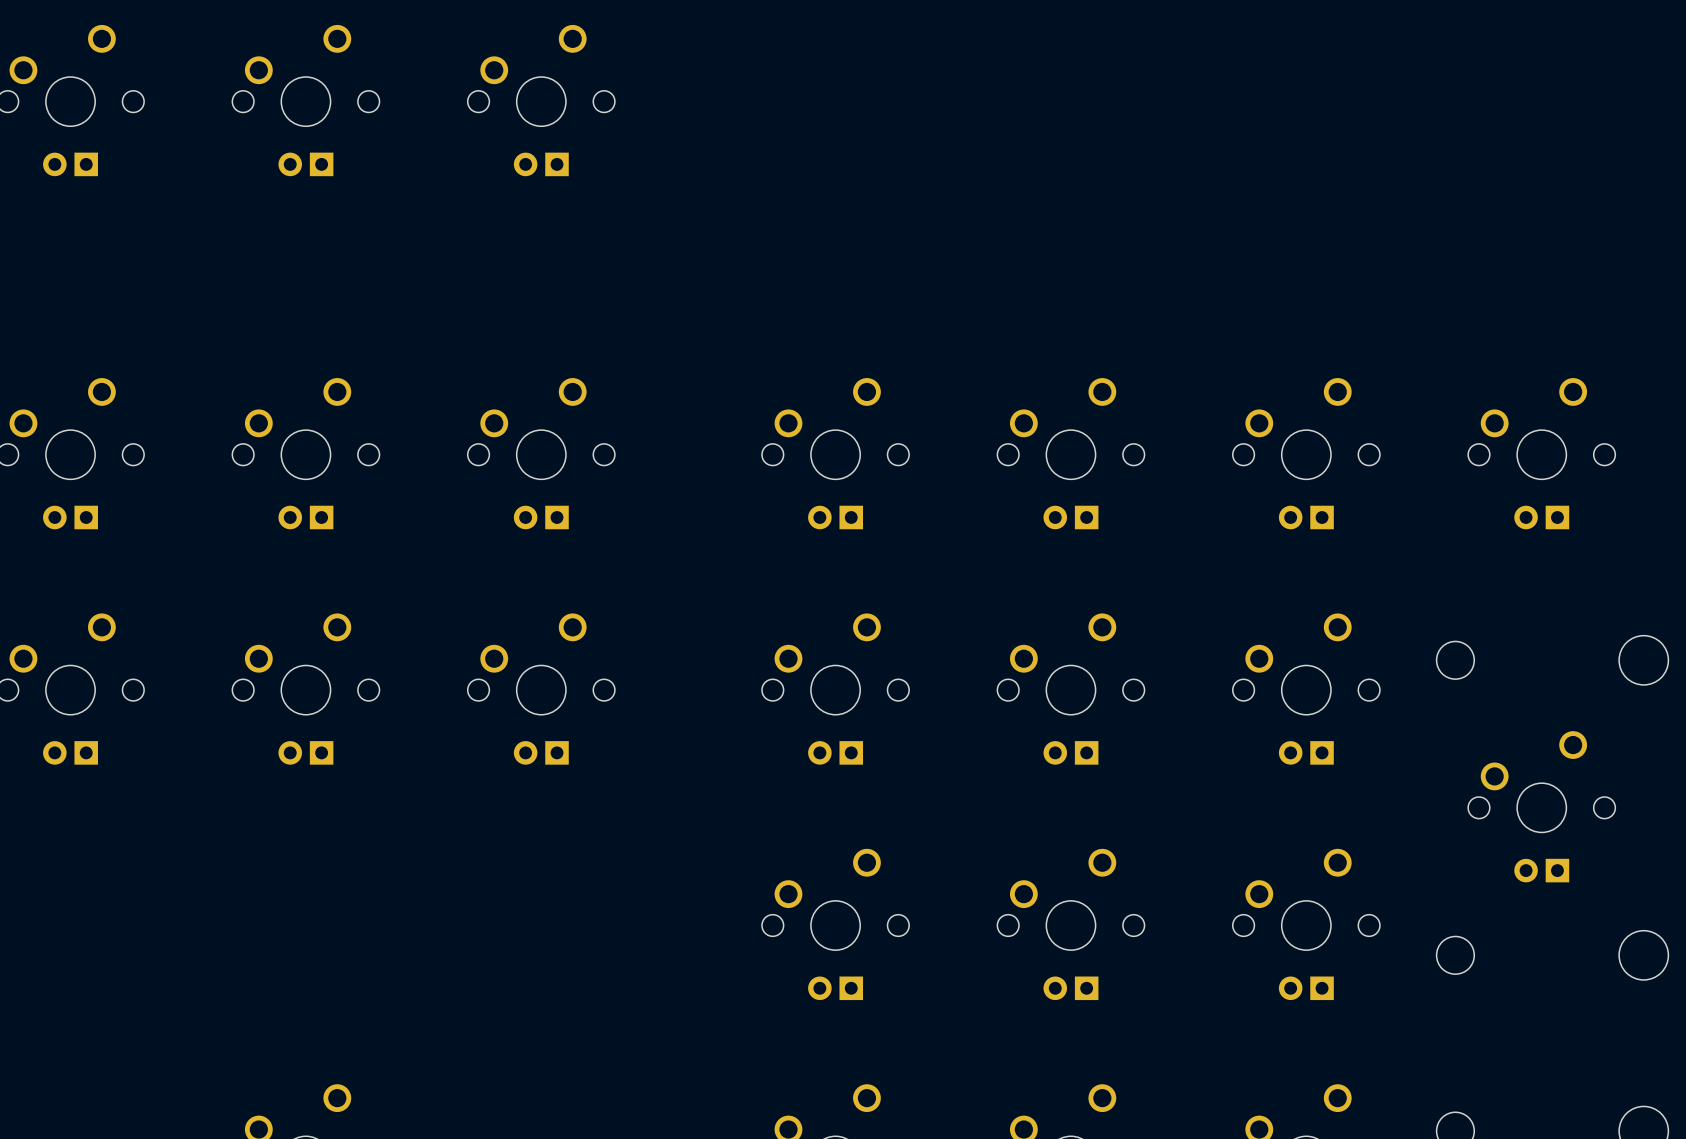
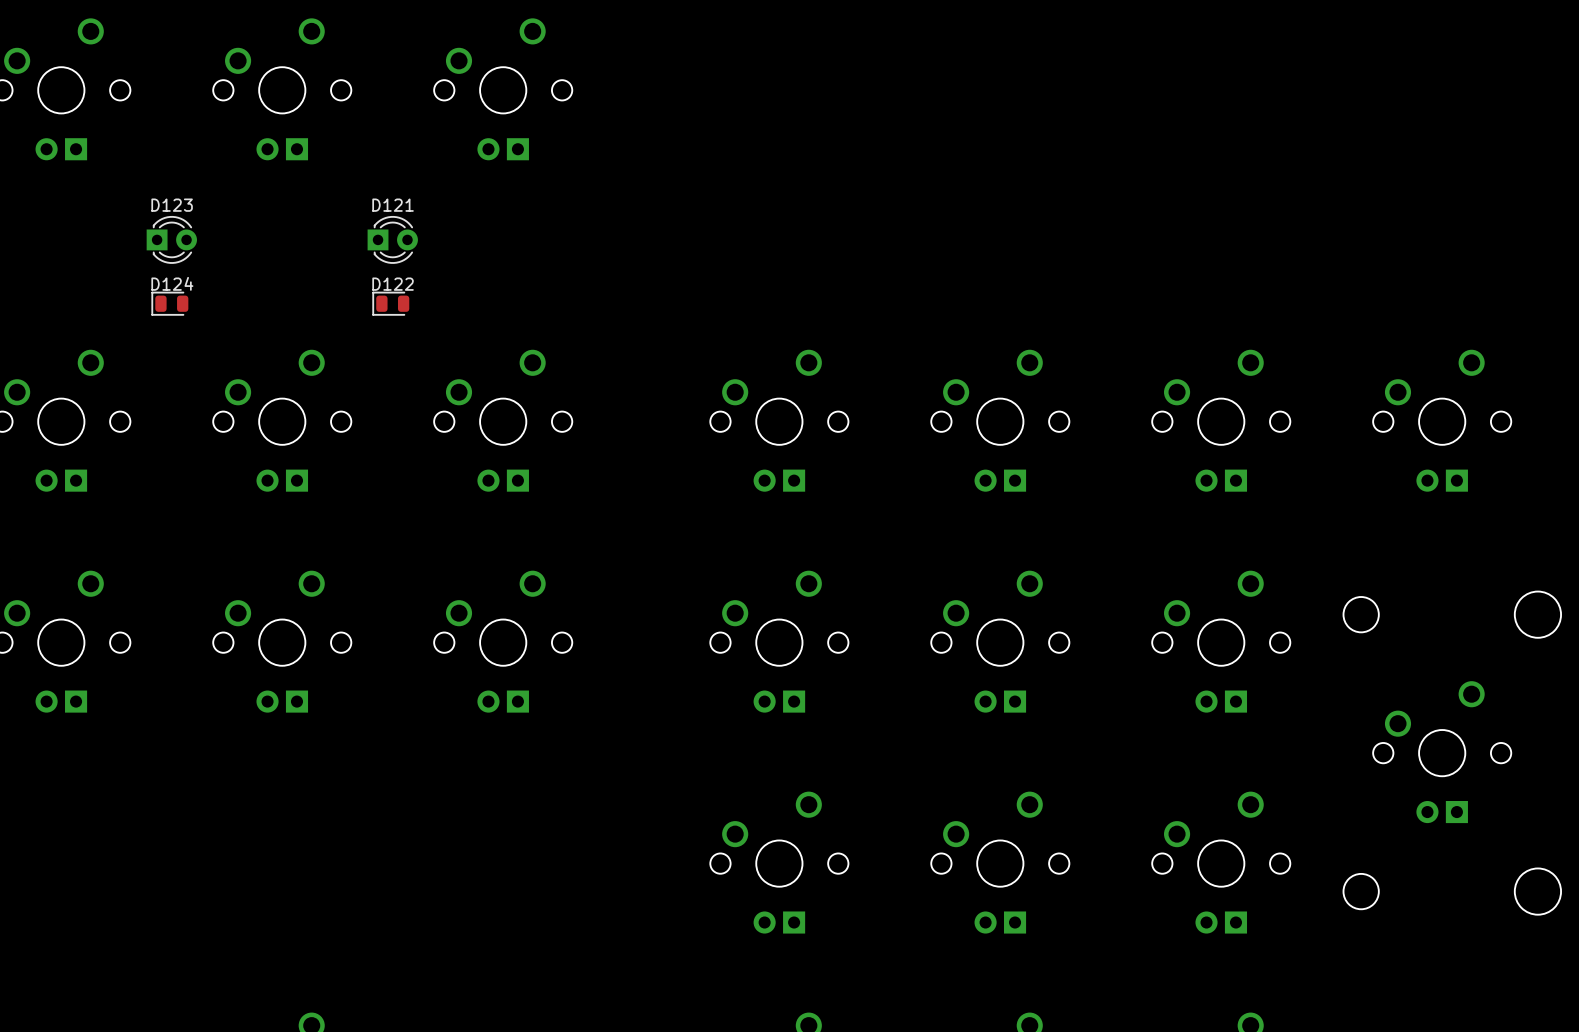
D123: none -> (171, 239)
D121: none -> (392, 239)
D124: none -> (169, 303)
D122: none -> (390, 303)

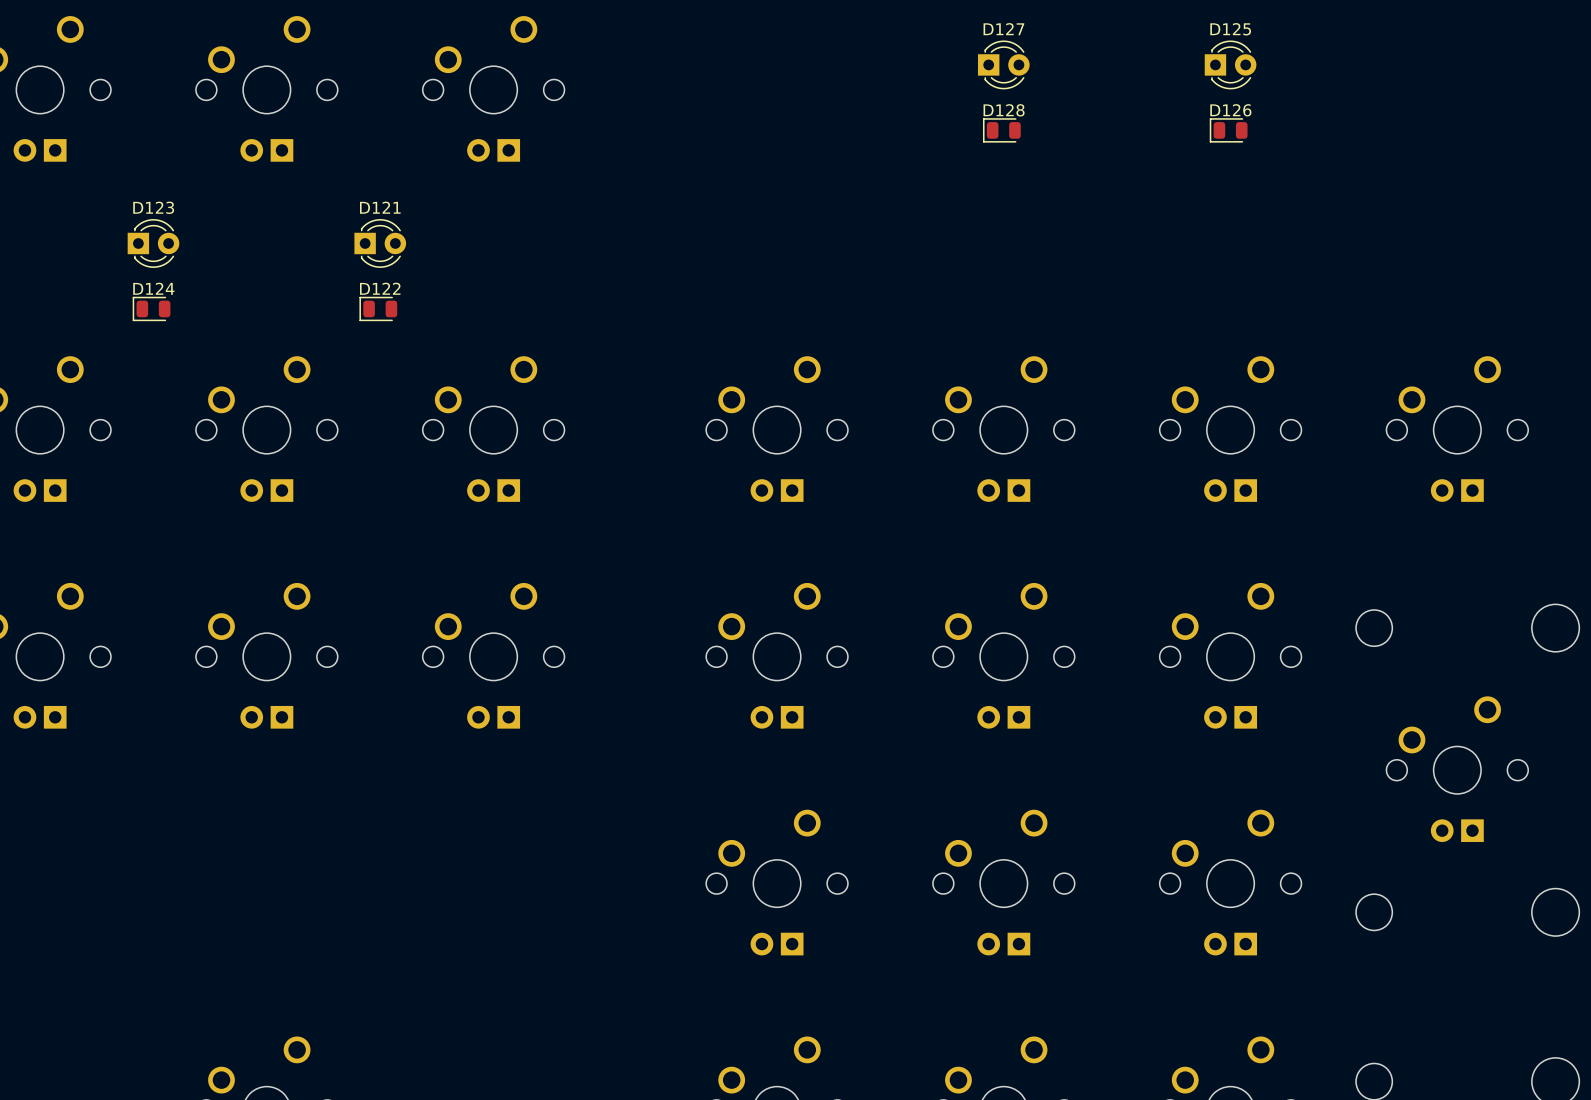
D127: none -> (1003, 64)
D125: none -> (1230, 64)
D128: none -> (1001, 130)
D126: none -> (1228, 130)

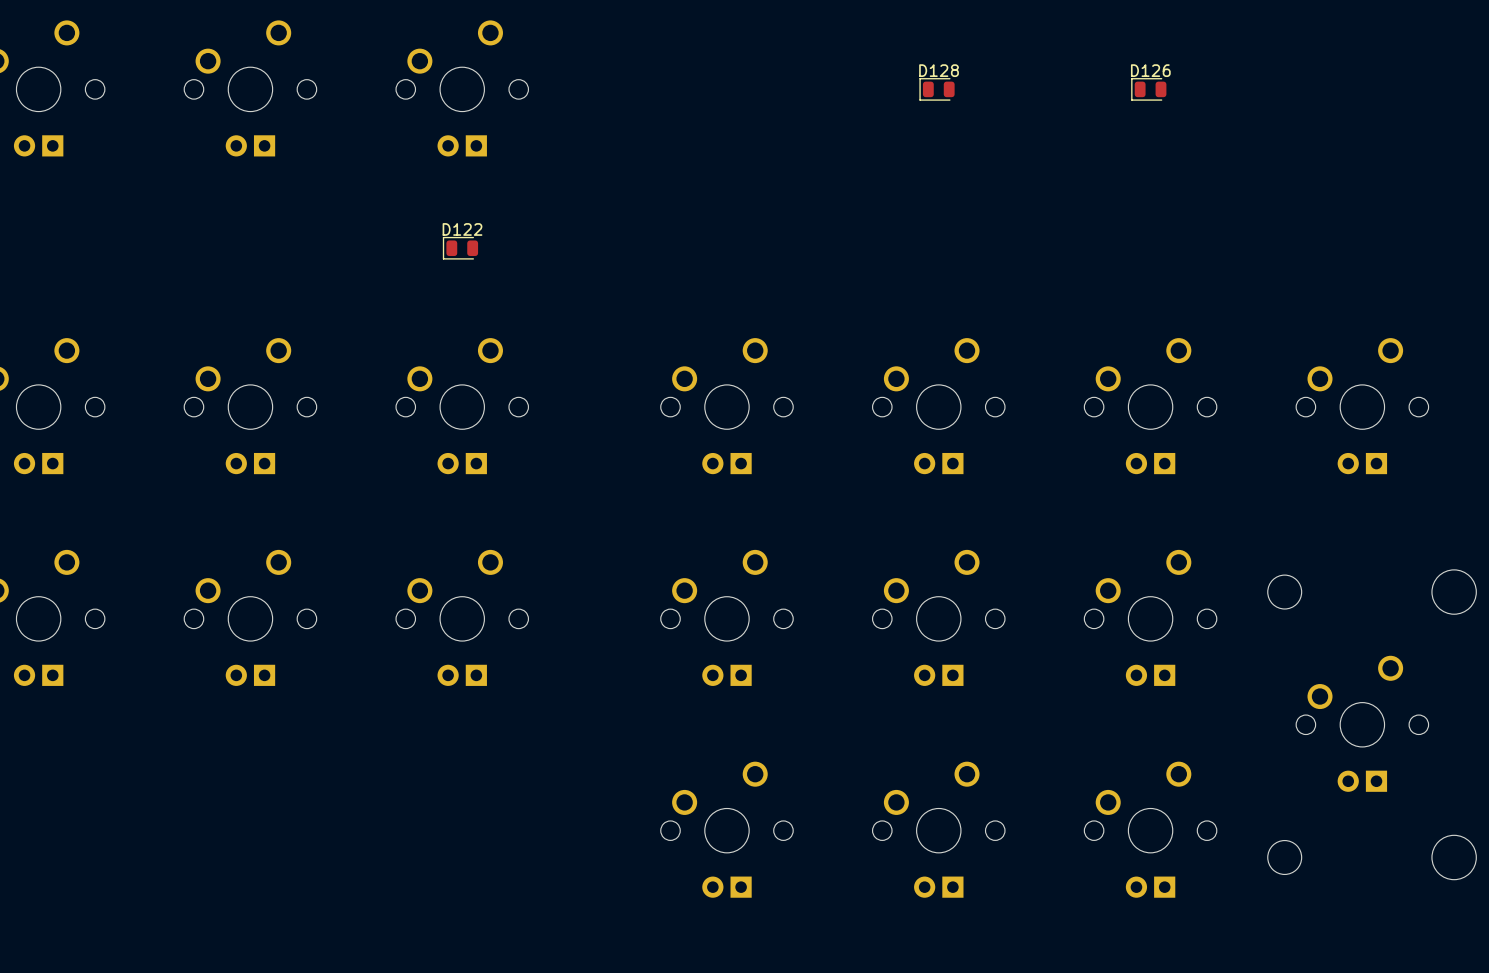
D127: (1003, 64) -> none
D125: (1230, 64) -> none
D128 position: (1001, 130) -> (936, 89)
D126 position: (1228, 130) -> (1148, 89)
D123: (153, 243) -> none
D121: (380, 243) -> none
D124: (151, 308) -> none
D122 position: (378, 308) -> (460, 248)

